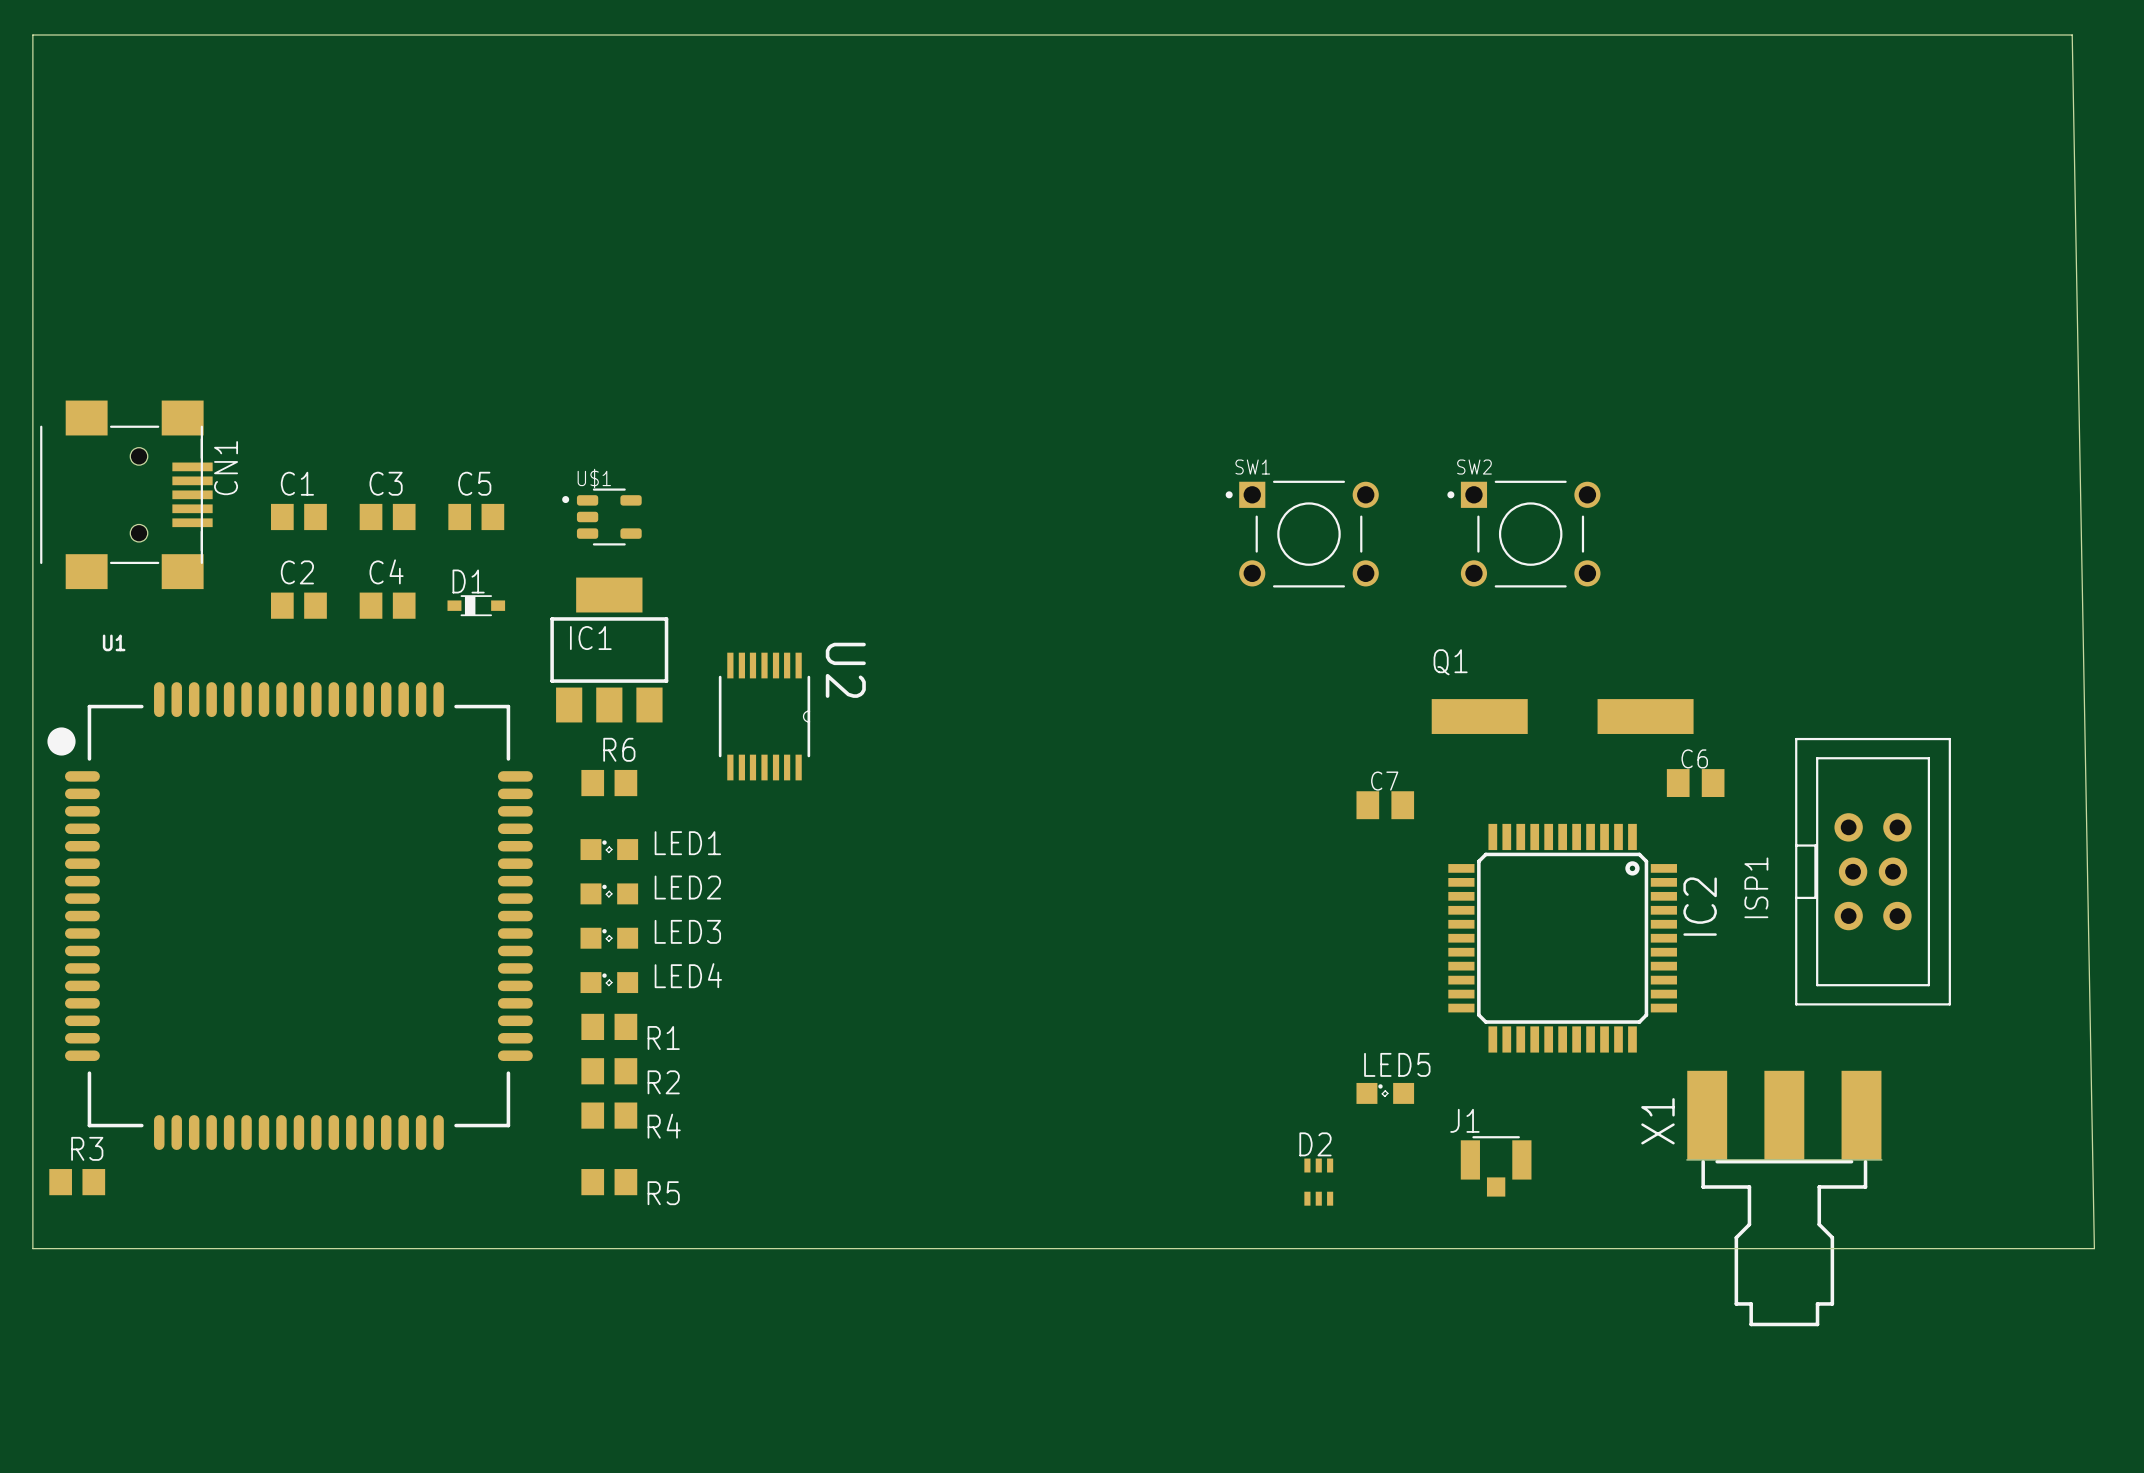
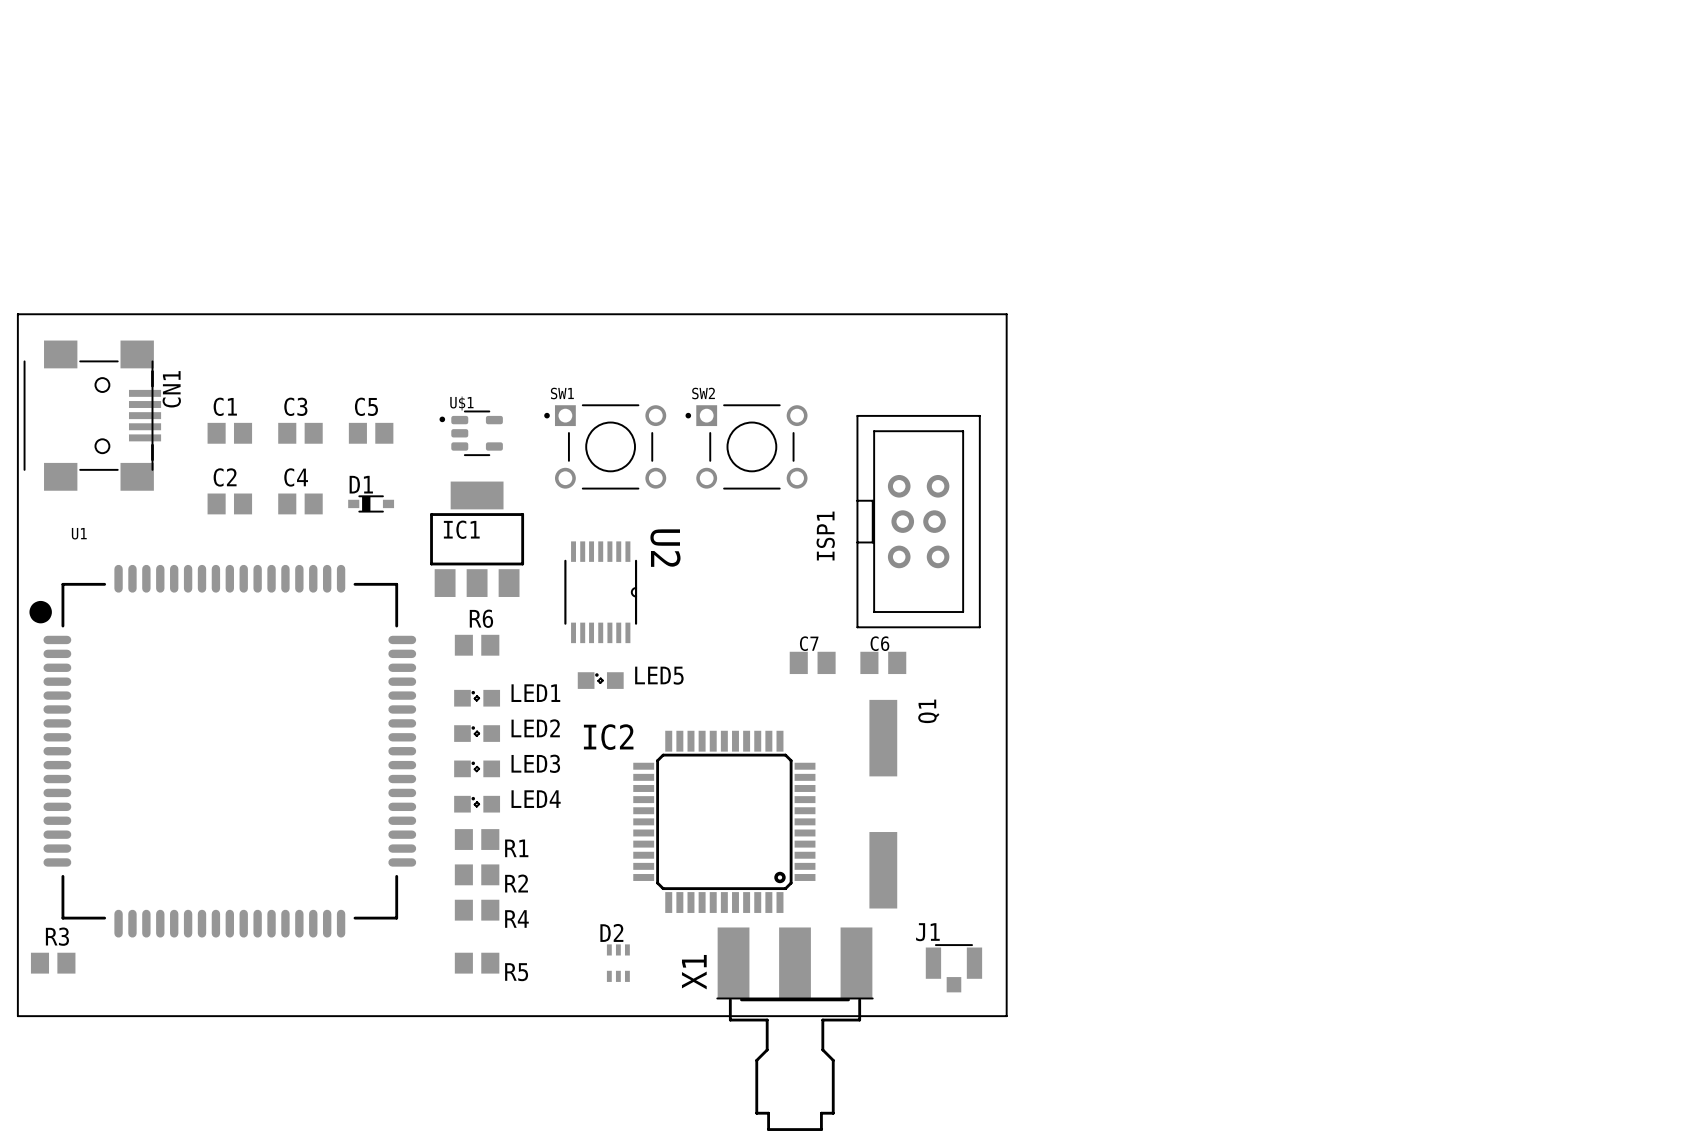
board edge: (32, 367) (32, 35) (2072, 35) (2094, 1248) (1274, 1248) -> (17, 314) (1006, 314) (1006, 1016)
SW1 position: (1302, 534) -> (605, 446)
SW2 position: (1523, 534) -> (746, 446)
Q1 rotation: 0° (1562, 716) -> 90° clockwise (883, 804)
Q1 position: (1562, 716) -> (883, 804)
C6 position: (1695, 783) -> (883, 662)
C7 position: (1385, 805) -> (812, 662)
ISP1 position: (1873, 871) -> (918, 521)
IC2 name position: IC2 (1700, 906) -> IC2 (608, 737)
IC2 rotation: 0° (1562, 938) -> 90° clockwise (724, 821)
IC2 position: (1562, 938) -> (724, 821)
LED5 name position: LED5 (1397, 1064) -> LED5 (659, 675)
LED5 position: (1385, 1093) -> (600, 680)
J1 position: (1496, 1166) -> (953, 968)
D2 position: (1318, 1182) -> (618, 963)
X1 position: (1784, 1198) -> (795, 1029)

